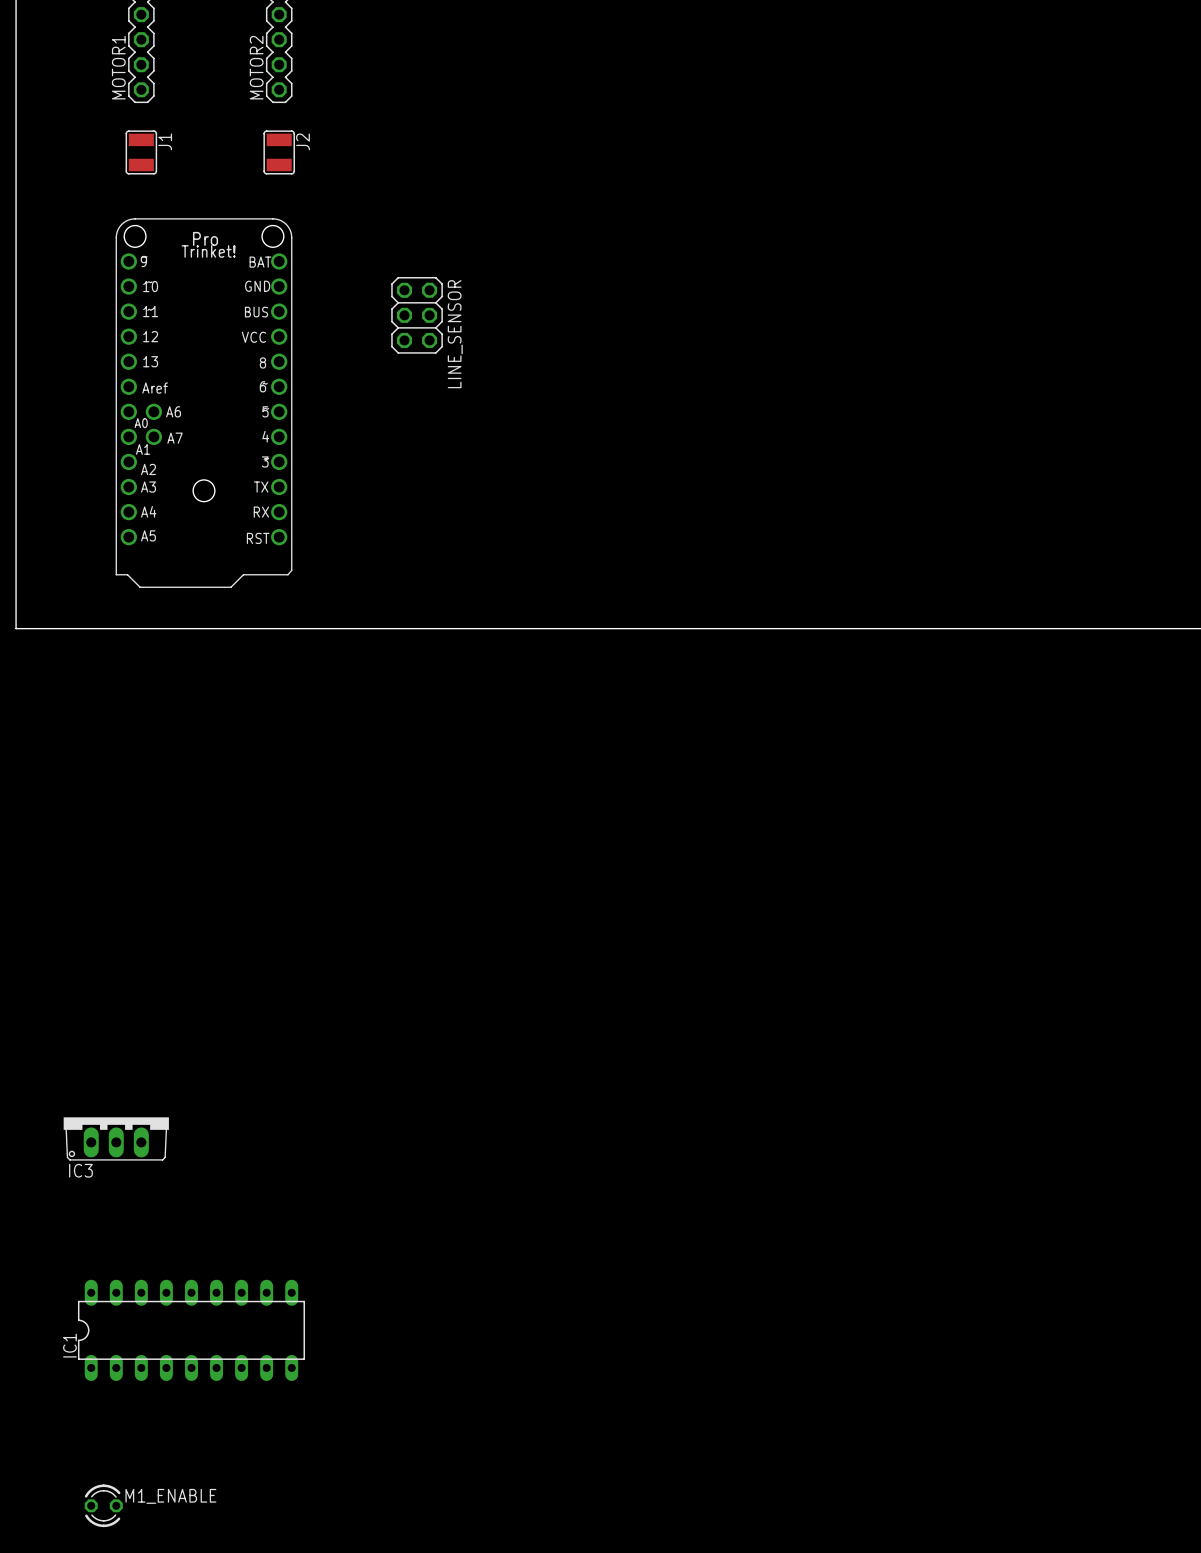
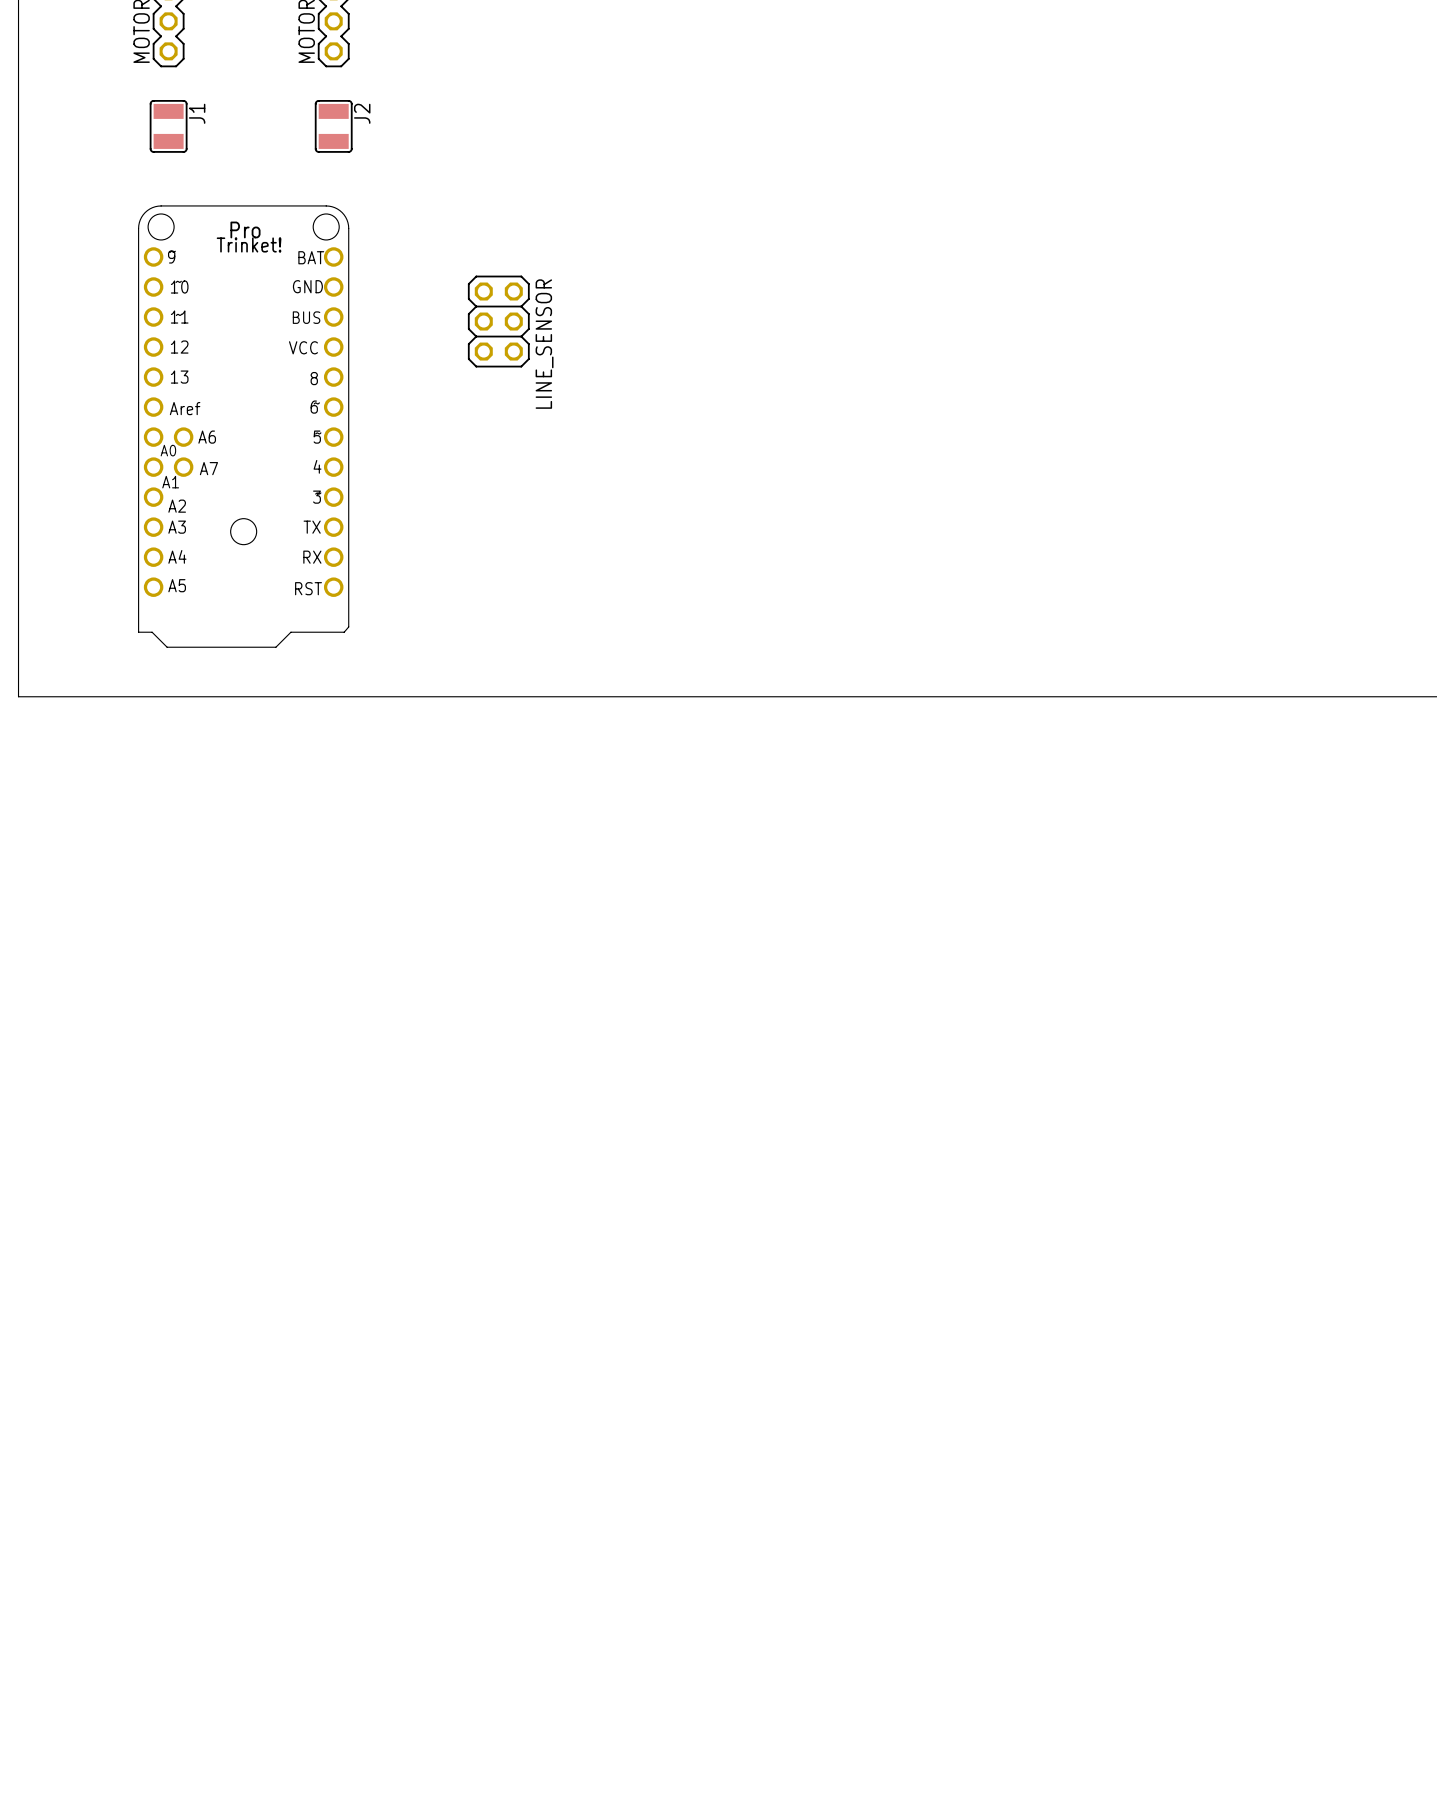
IC3: (116, 1138) -> none
IC1: (191, 1330) -> none
M1_ENABLE: (103, 1505) -> none

